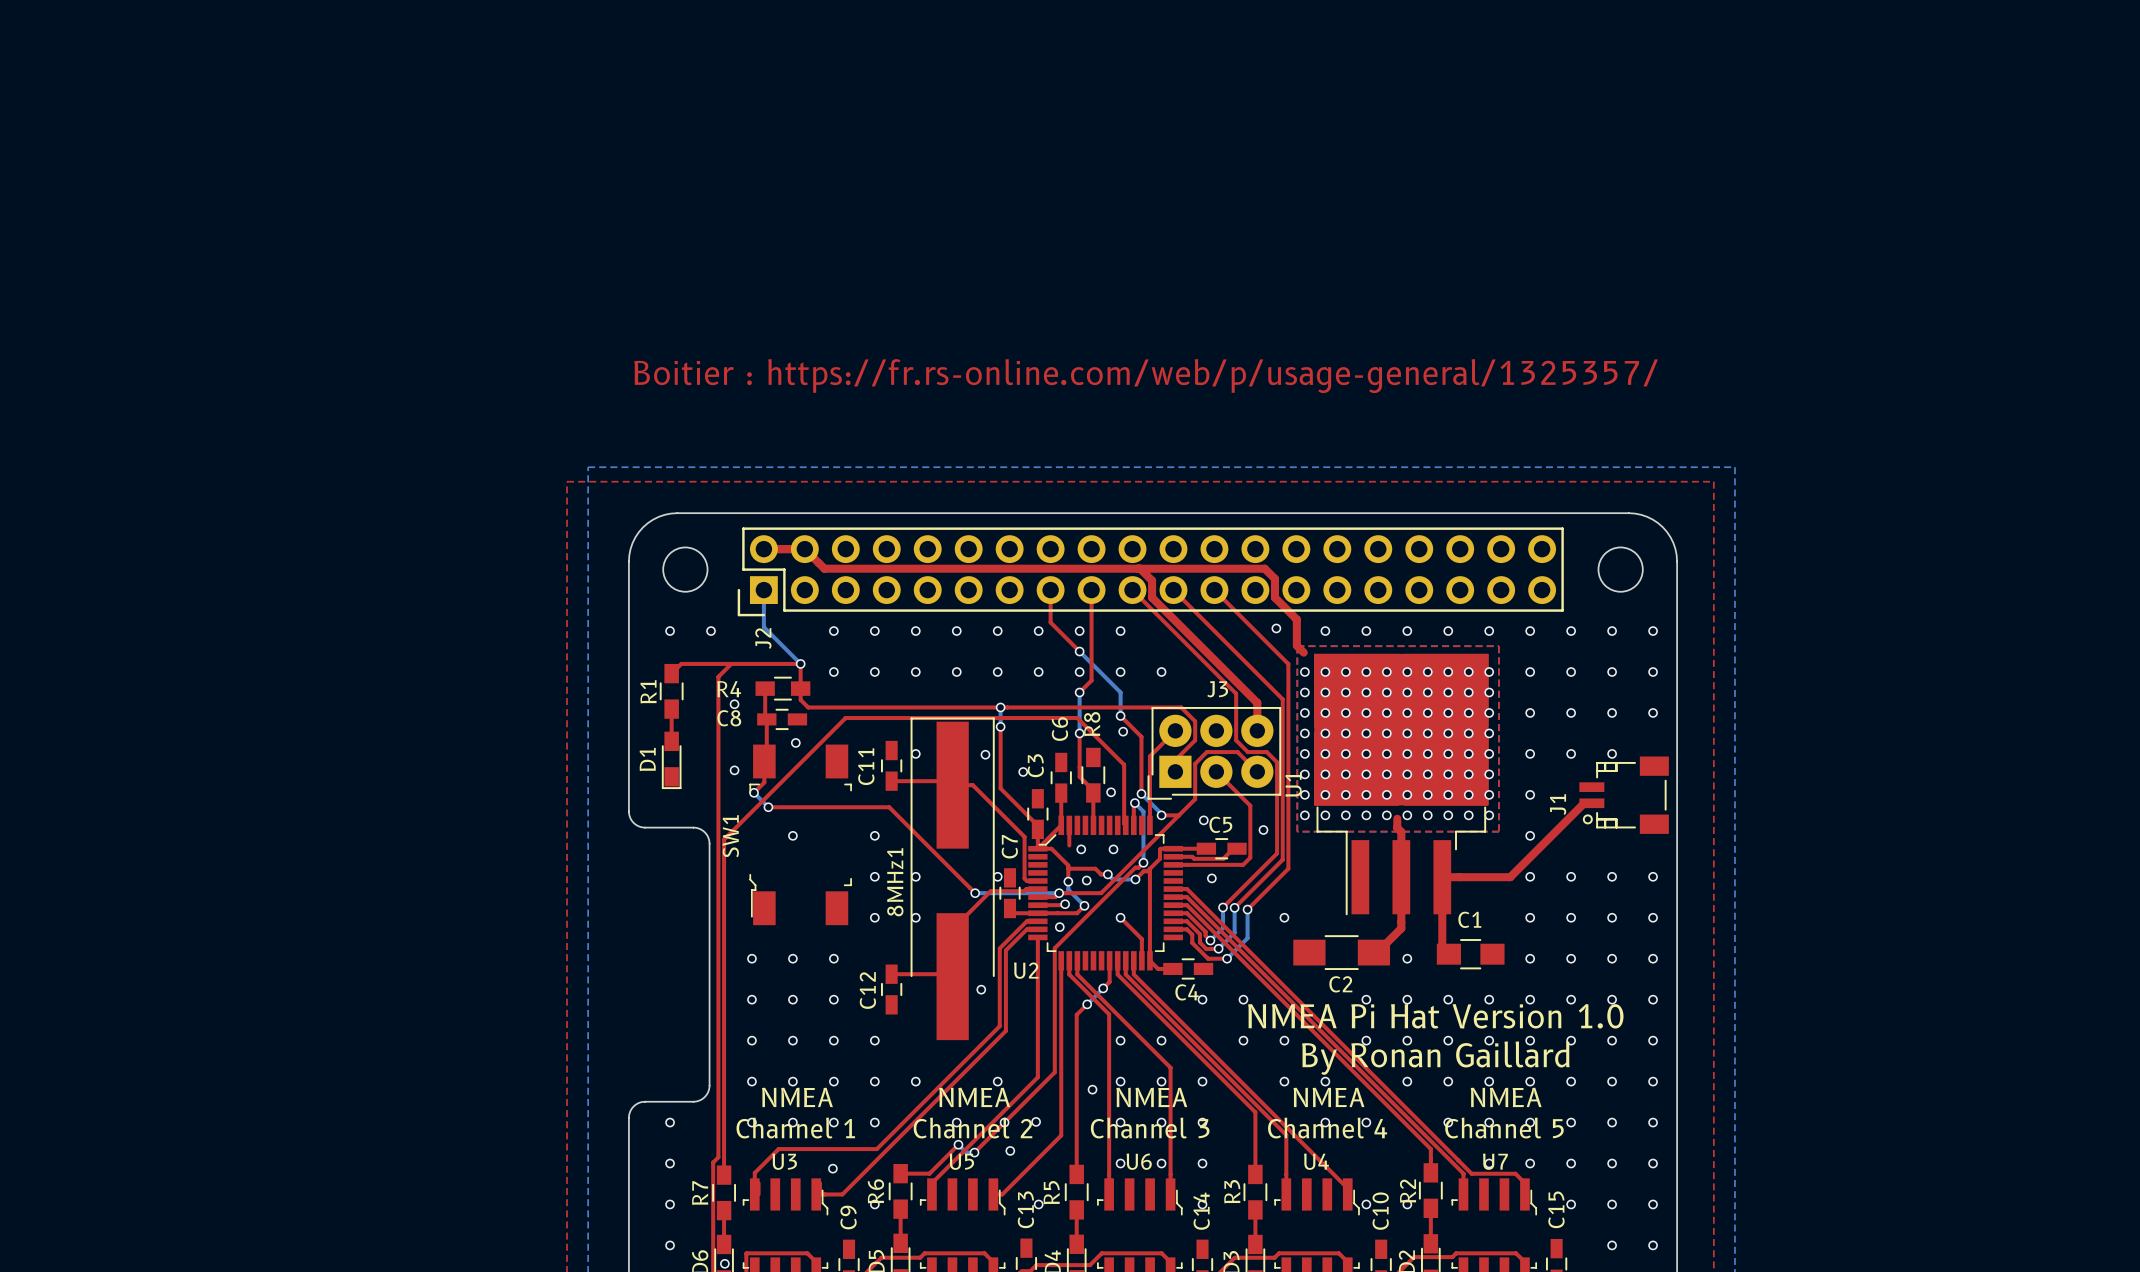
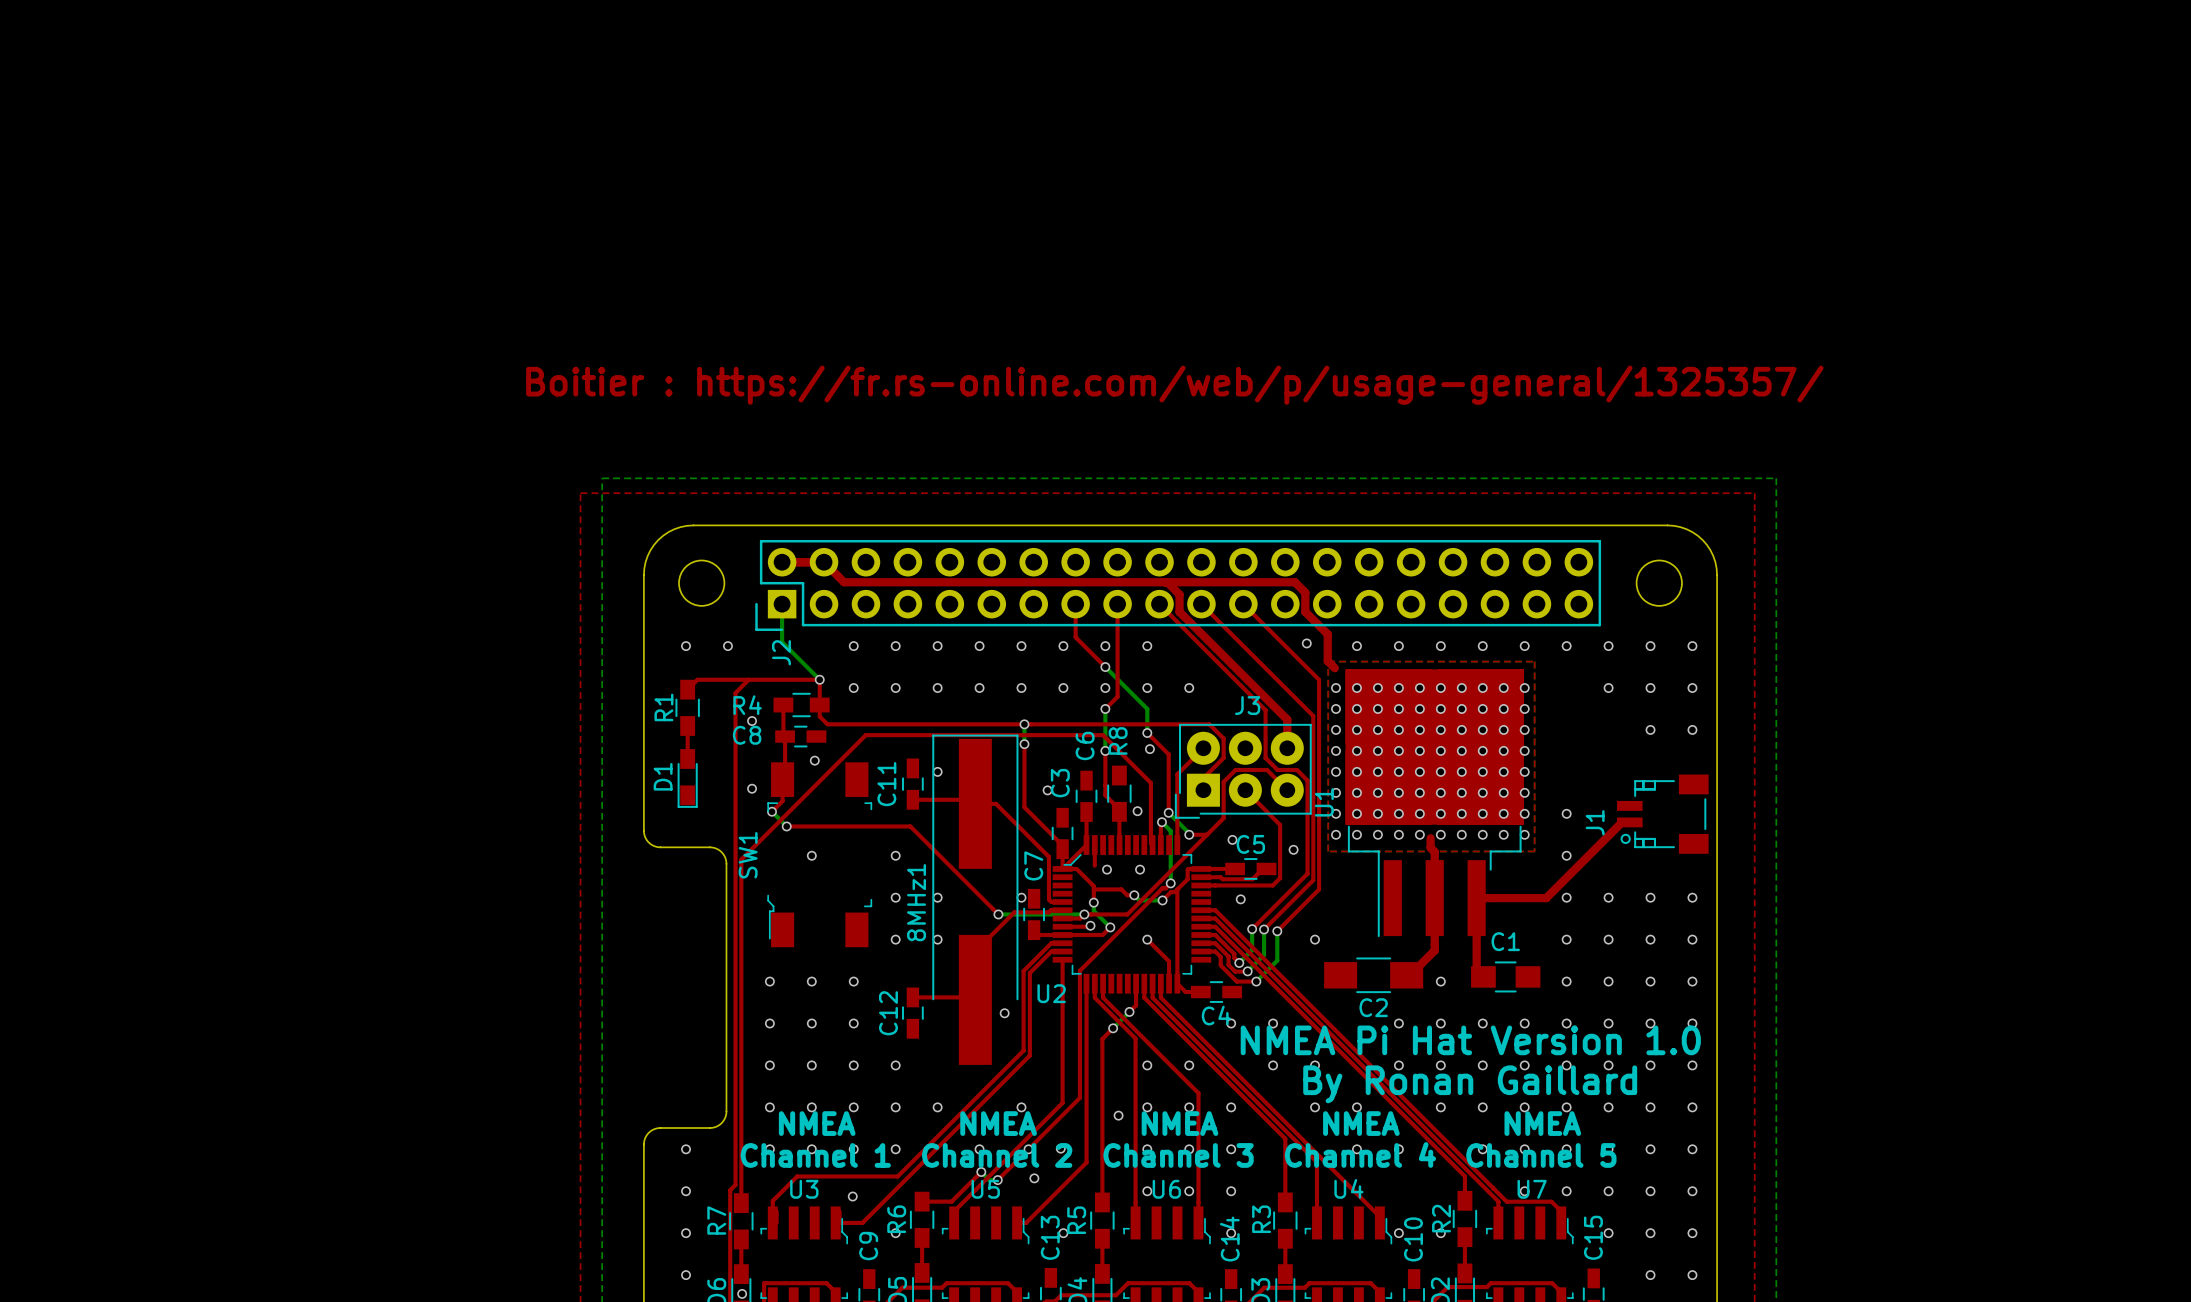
via: (1530, 672) -> none
via: (1530, 712) -> none
via: (1571, 712) -> none
via: (1530, 753) -> none
via: (1571, 753) -> none
via: (1612, 753) -> none
via: (985, 754) -> none
via: (1086, 880) -> none
via: (1059, 927) -> none

